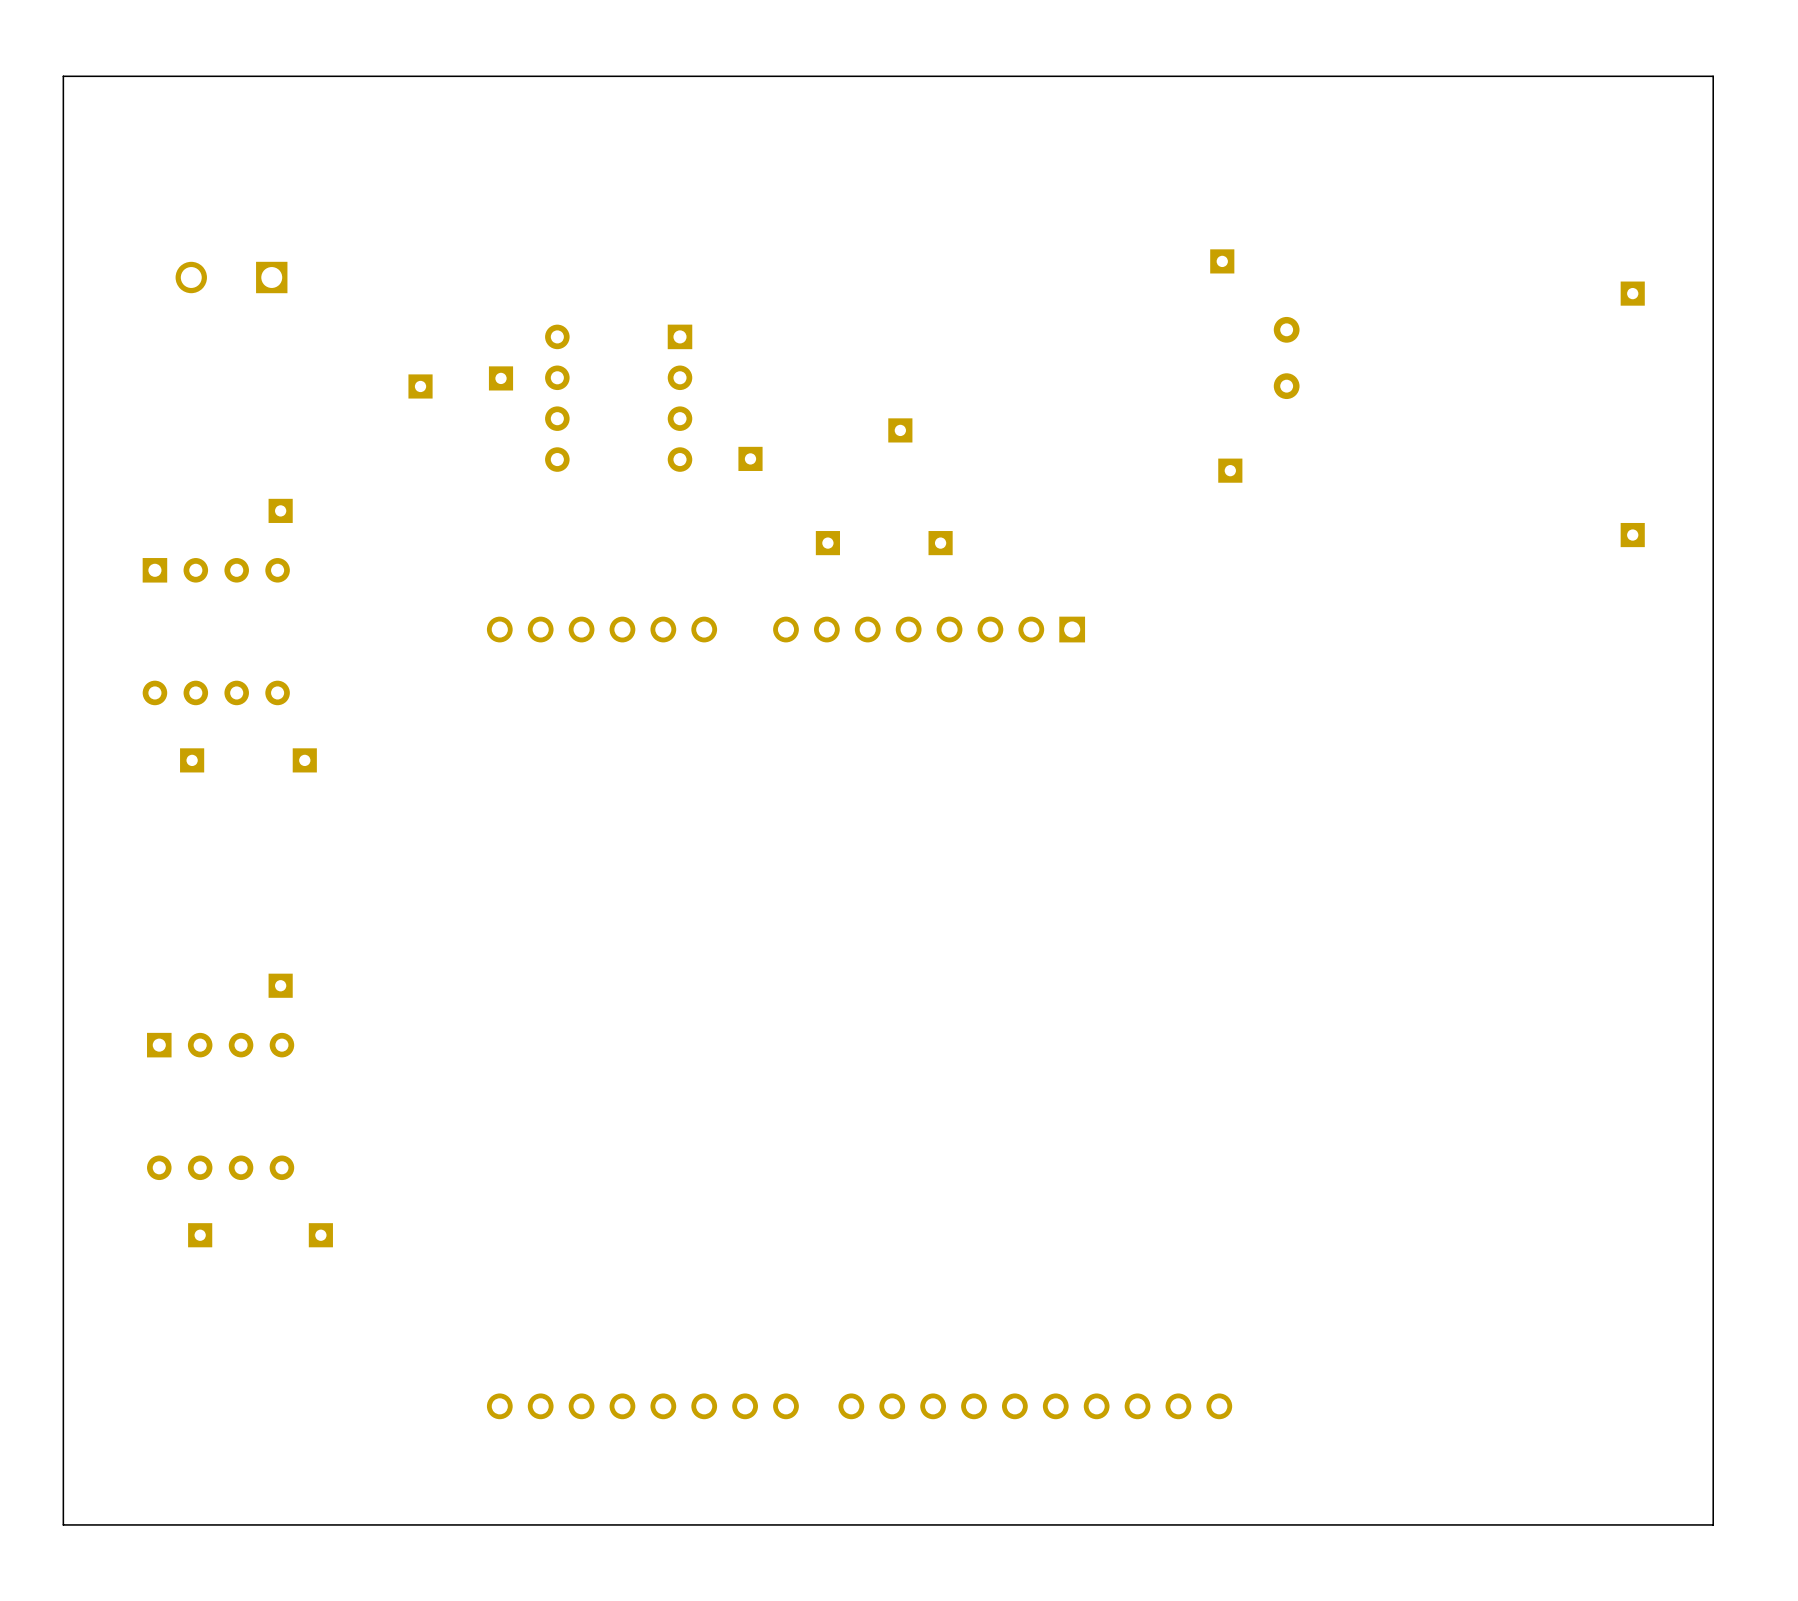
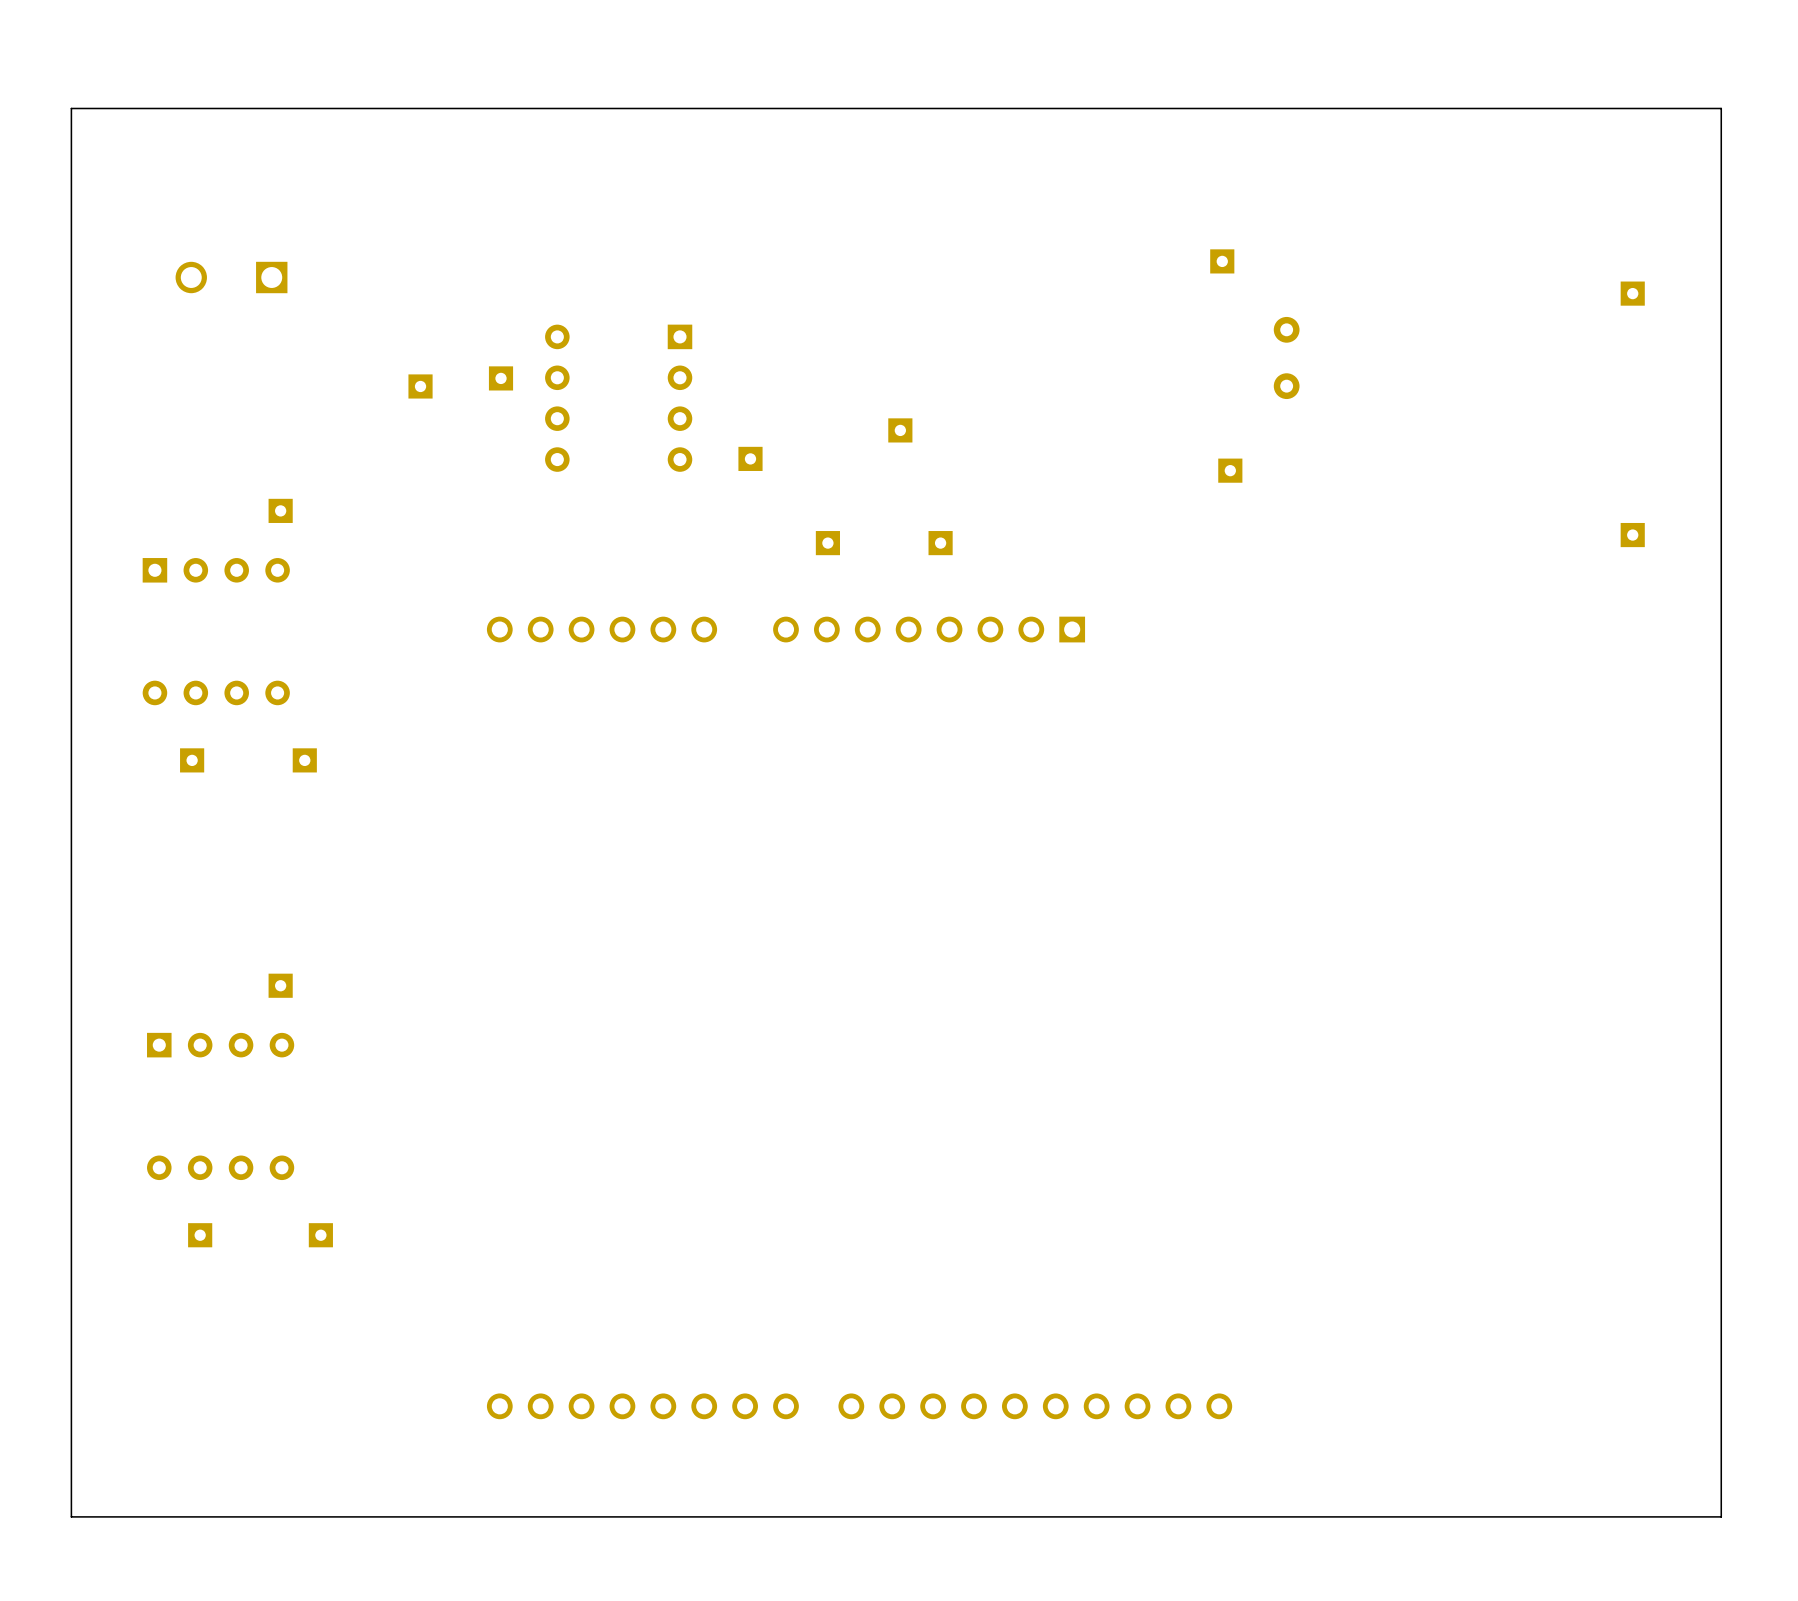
board edge: (1713, 76) (63, 76) (63, 1524) (1713, 1524) (1713, 76) -> (1721, 108) (1721, 1516) (71, 1516) (71, 108) (1721, 108)

